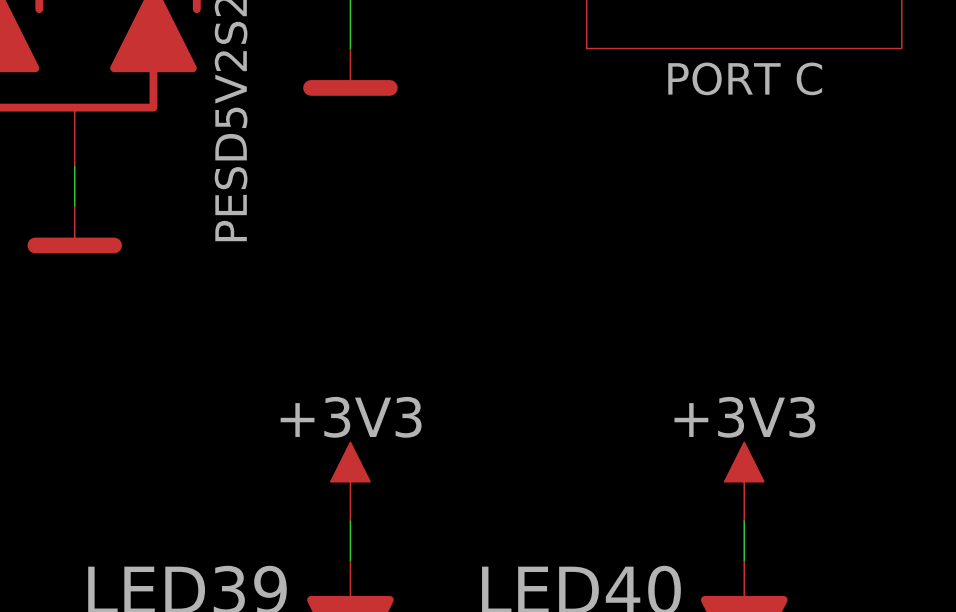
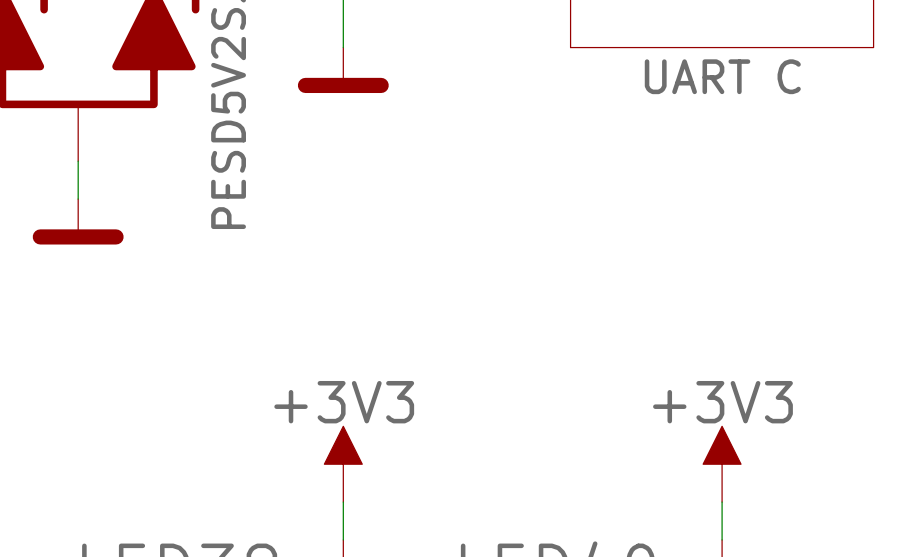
part value: PORT C (745, 78) -> UART C (722, 76)

